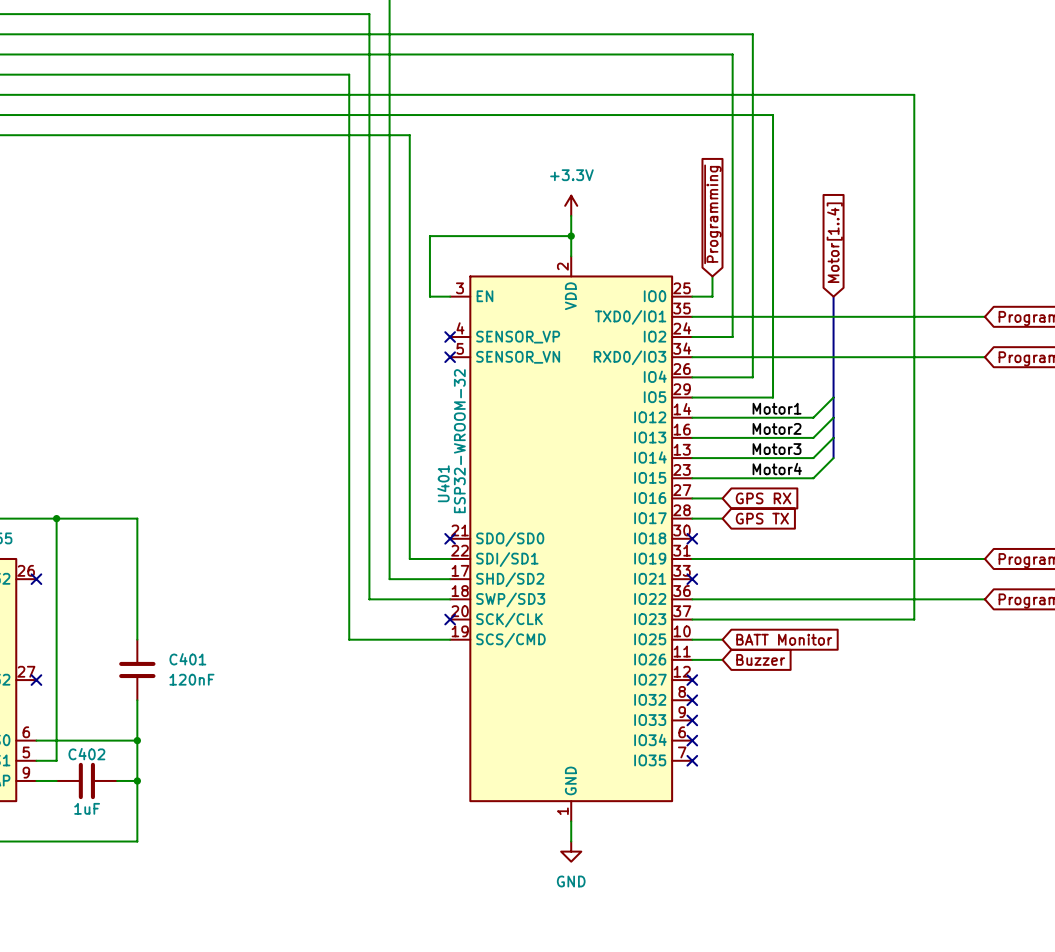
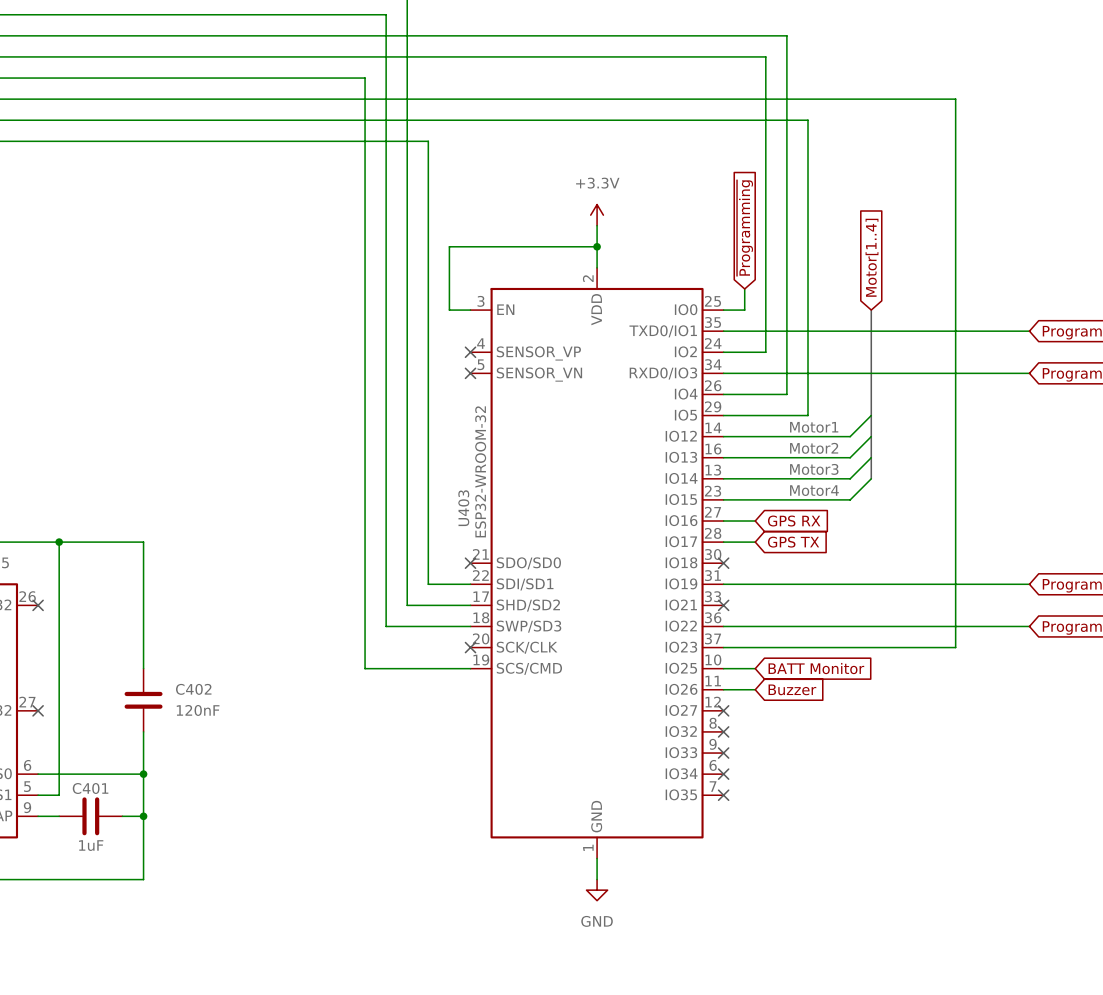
U401 name: U401 (443, 483) -> U403 (463, 508)
C401 name: C401 (187, 659) -> C402 (193, 689)
C402 name: C402 (86, 754) -> C401 (90, 788)

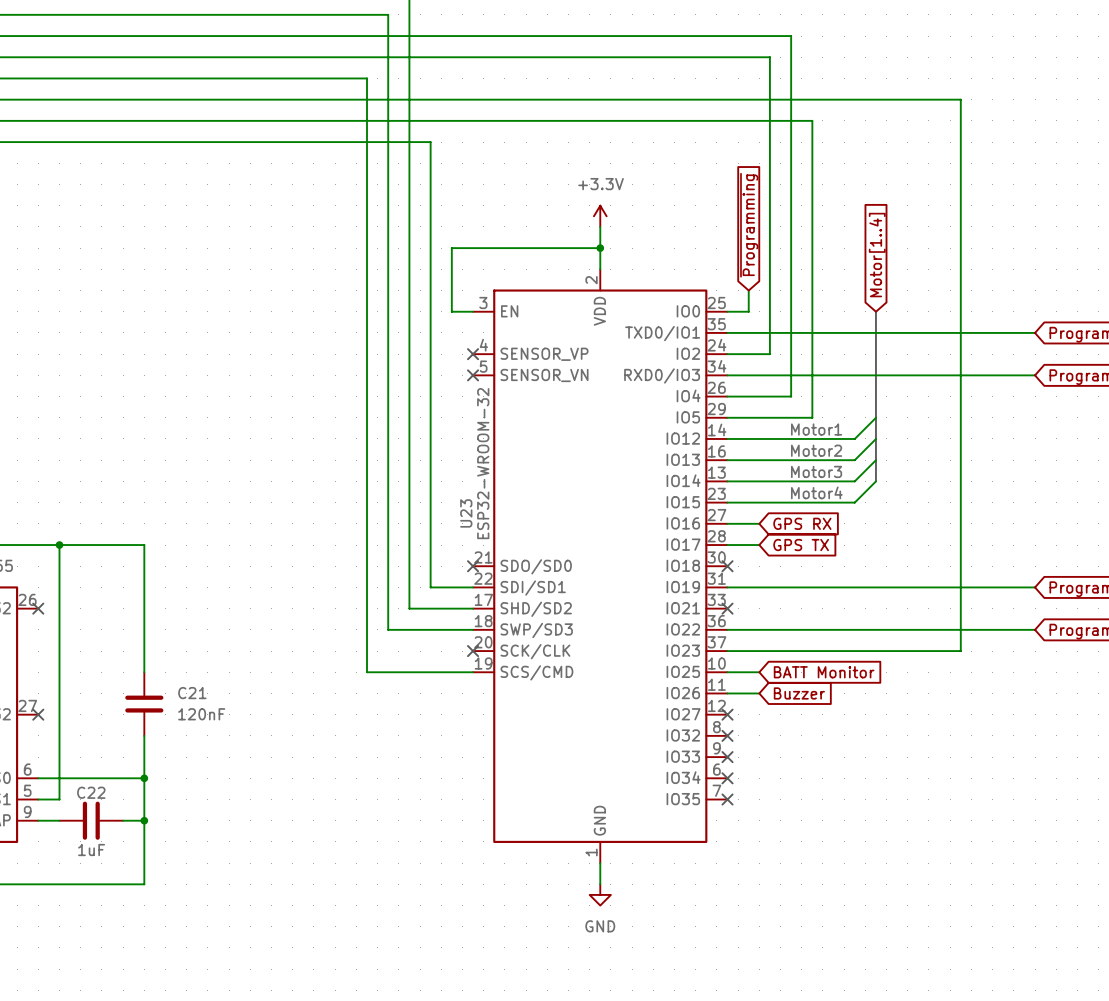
U403 name: U403 (463, 508) -> U23 (466, 513)
C402 name: C402 (193, 689) -> C21 (192, 693)
C401 name: C401 (90, 788) -> C22 (91, 792)

